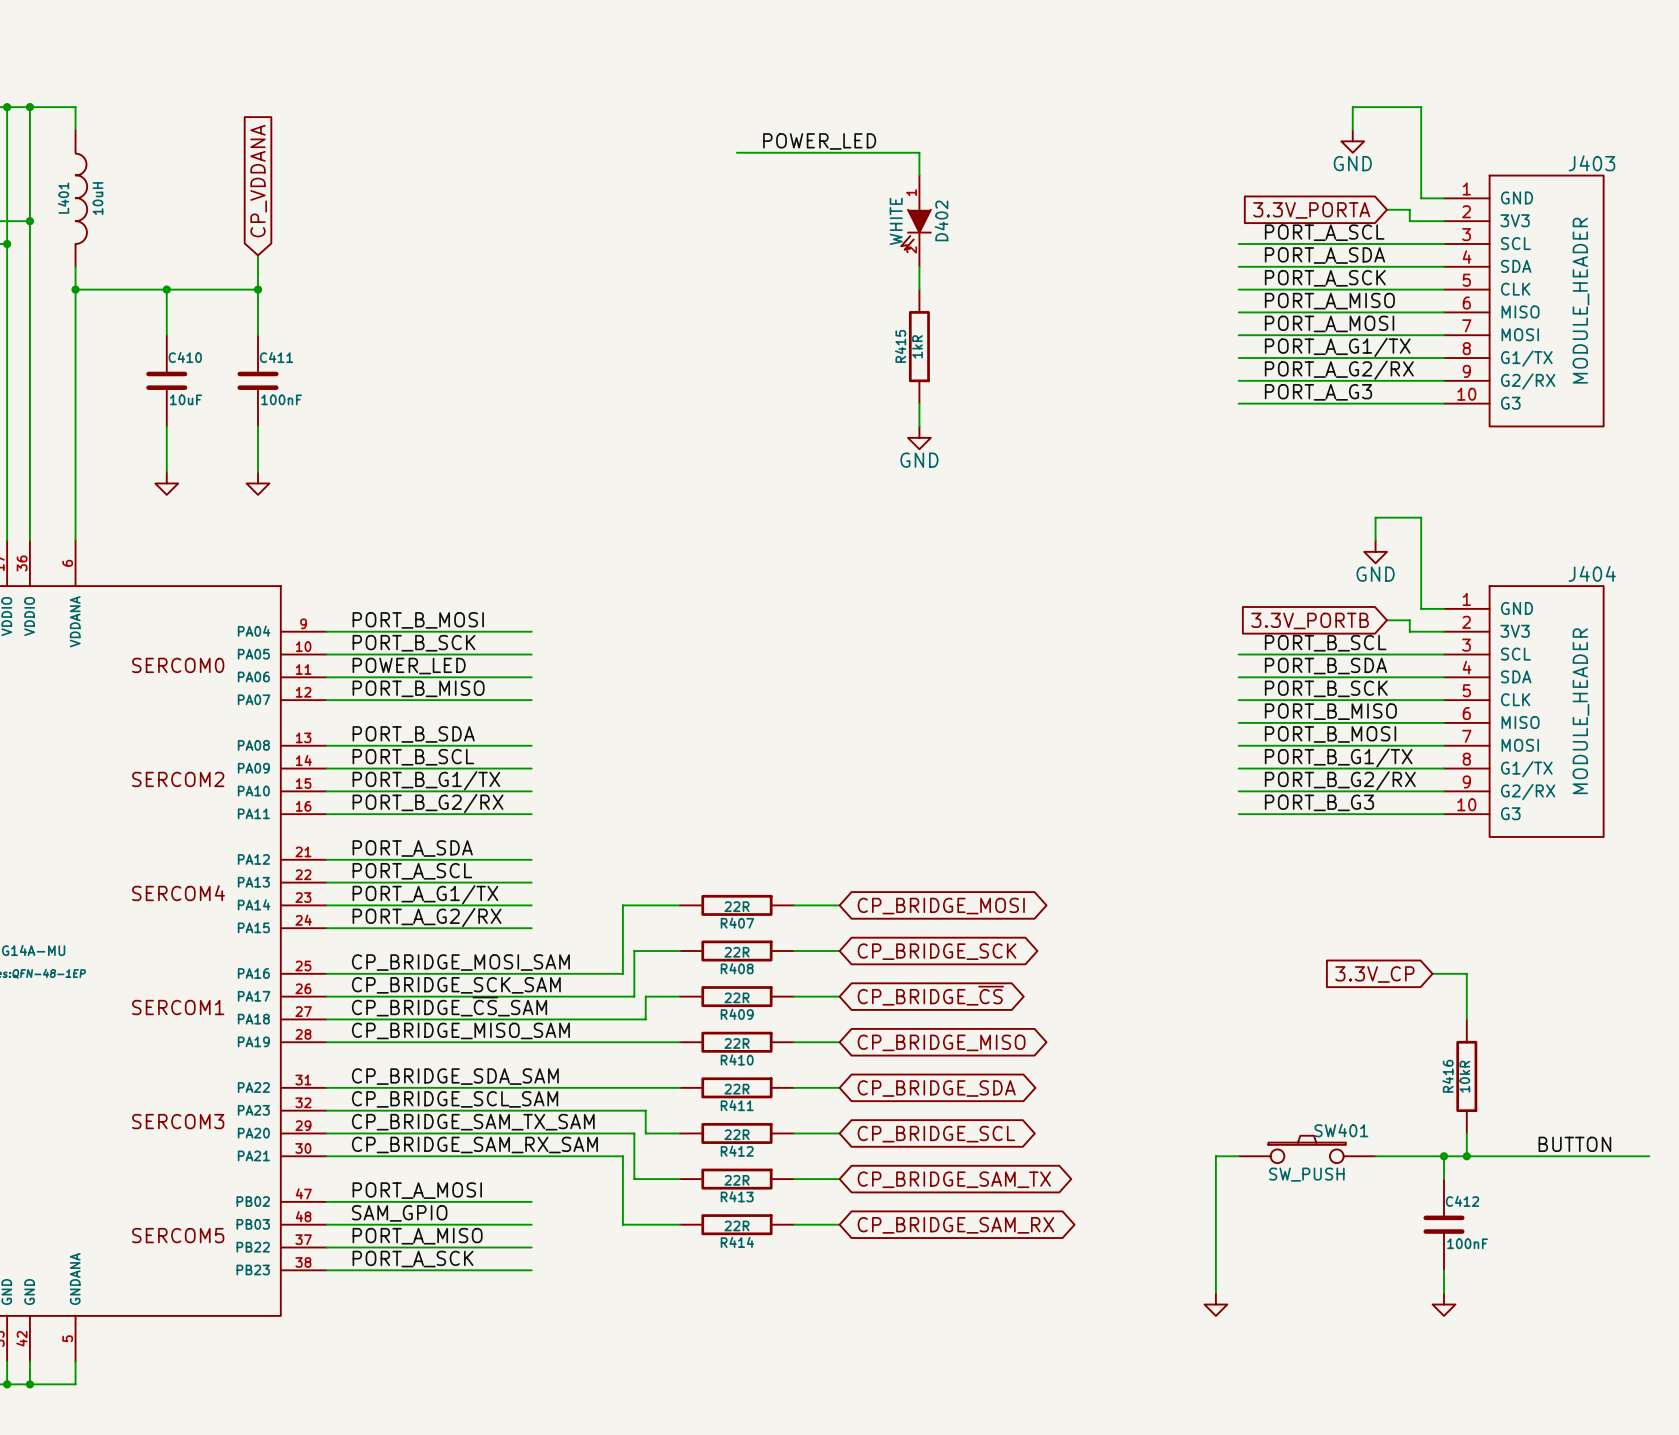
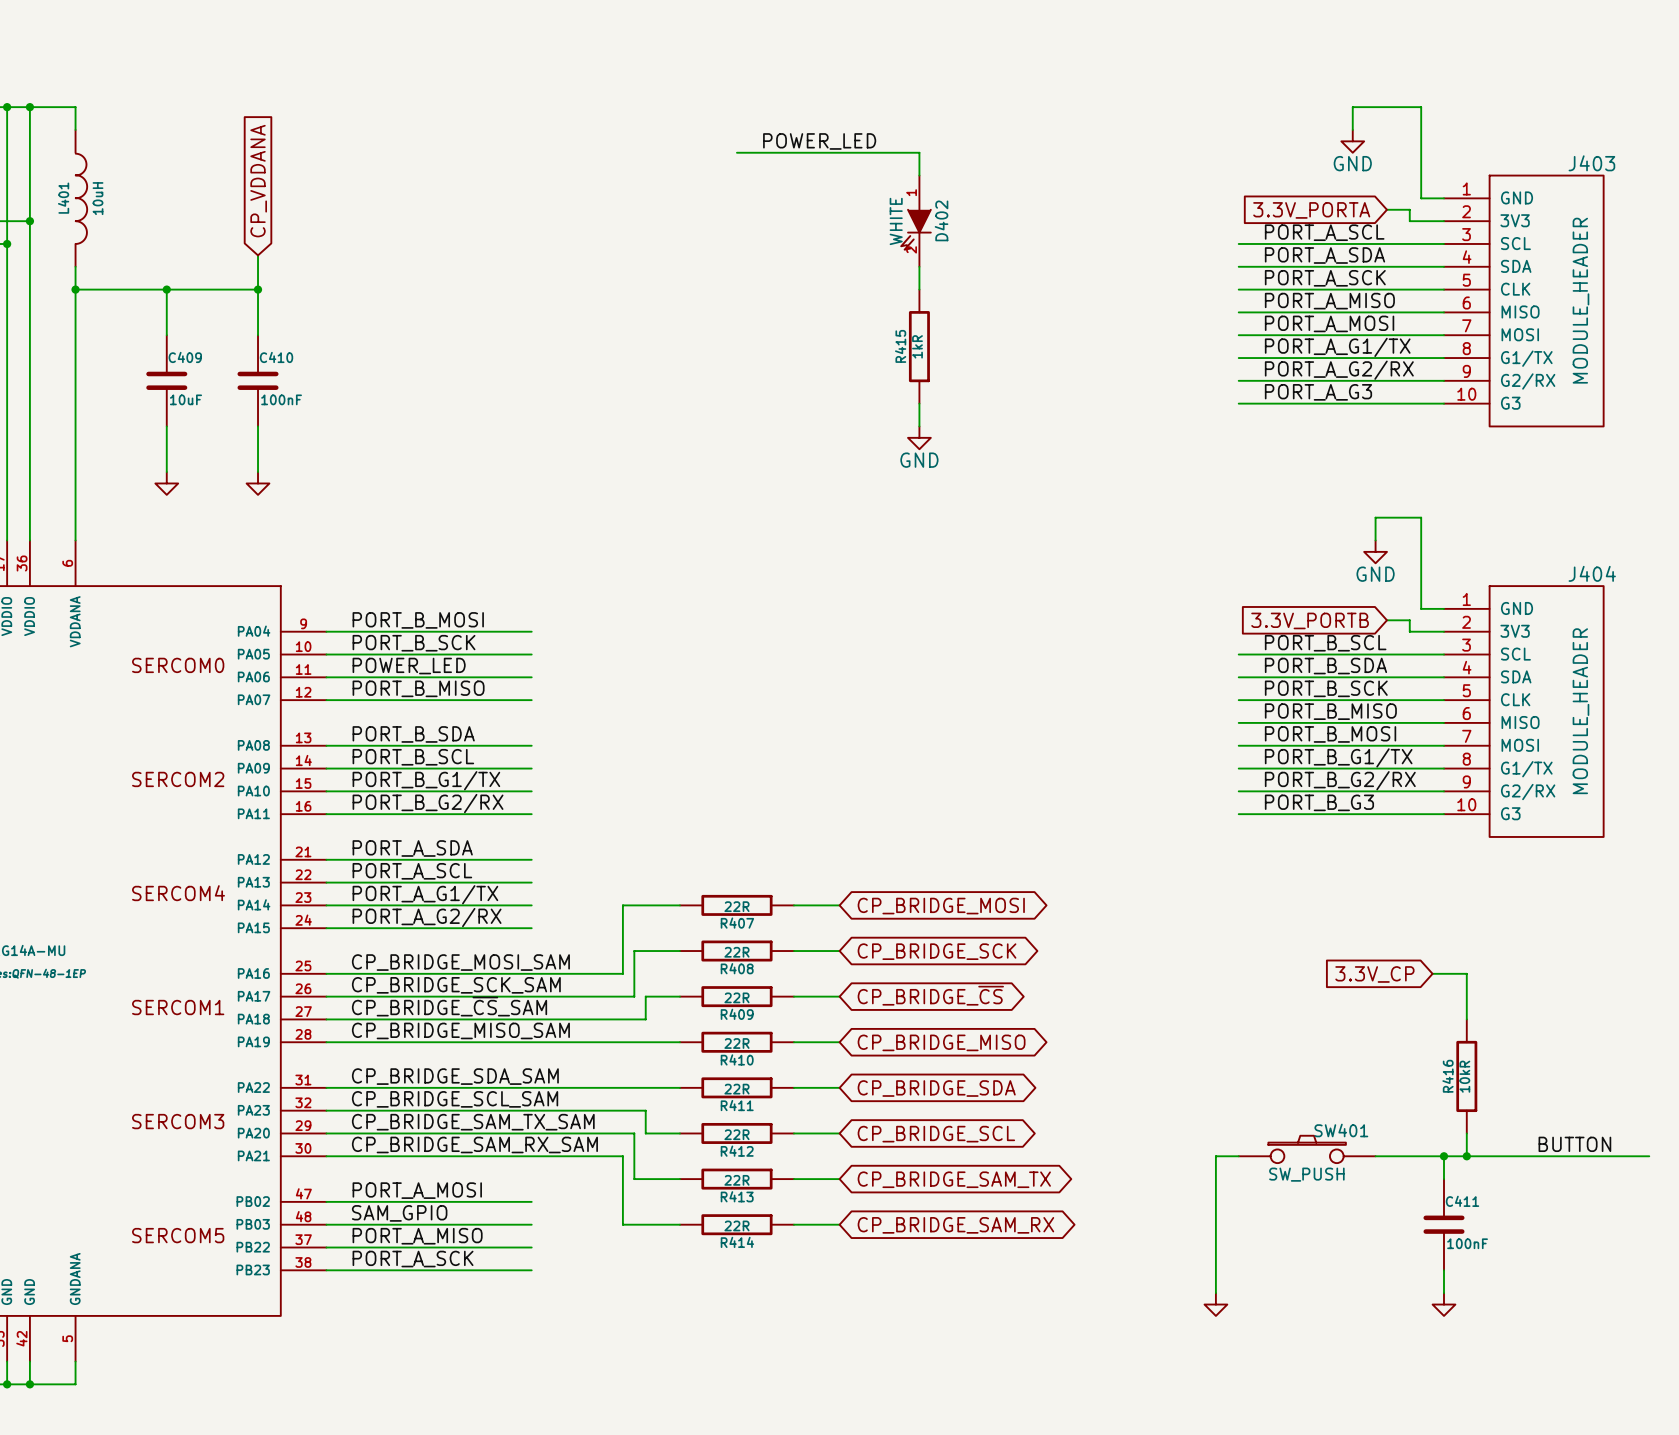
C410 name: C410 (185, 357) -> C409 (185, 357)
C411 name: C411 (276, 357) -> C410 (276, 357)
C412 name: C412 (1462, 1201) -> C411 (1462, 1201)

